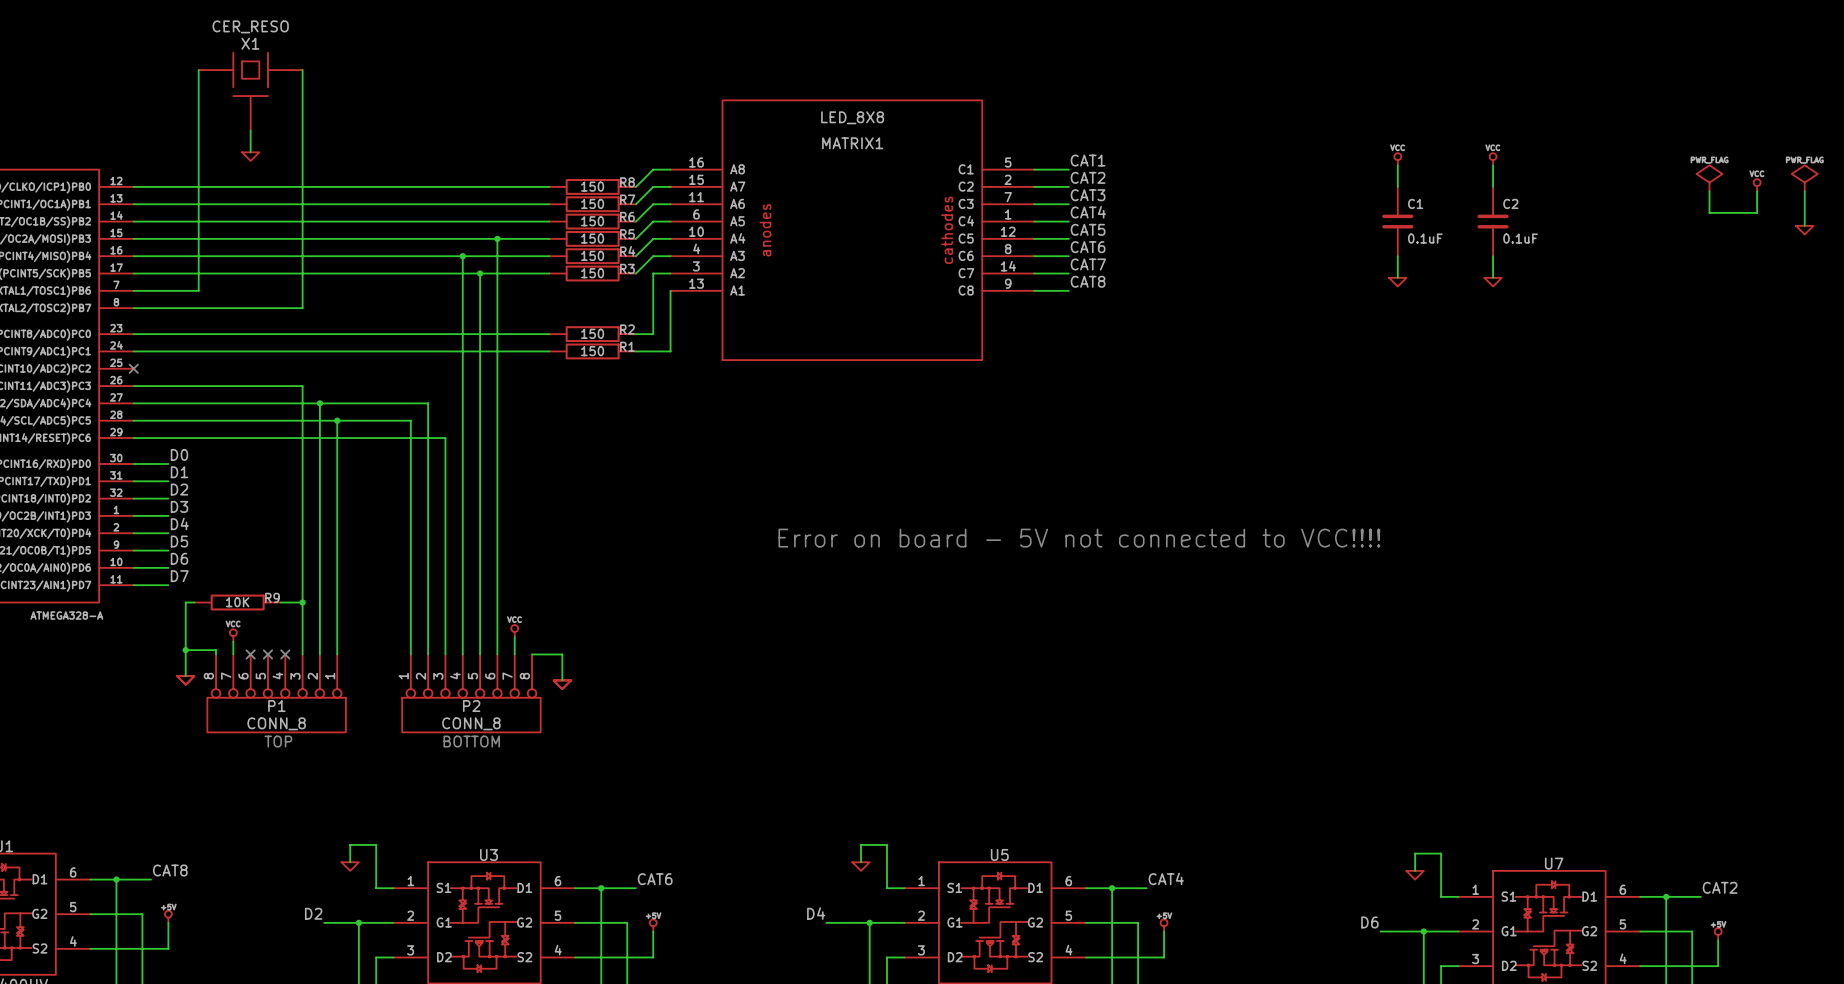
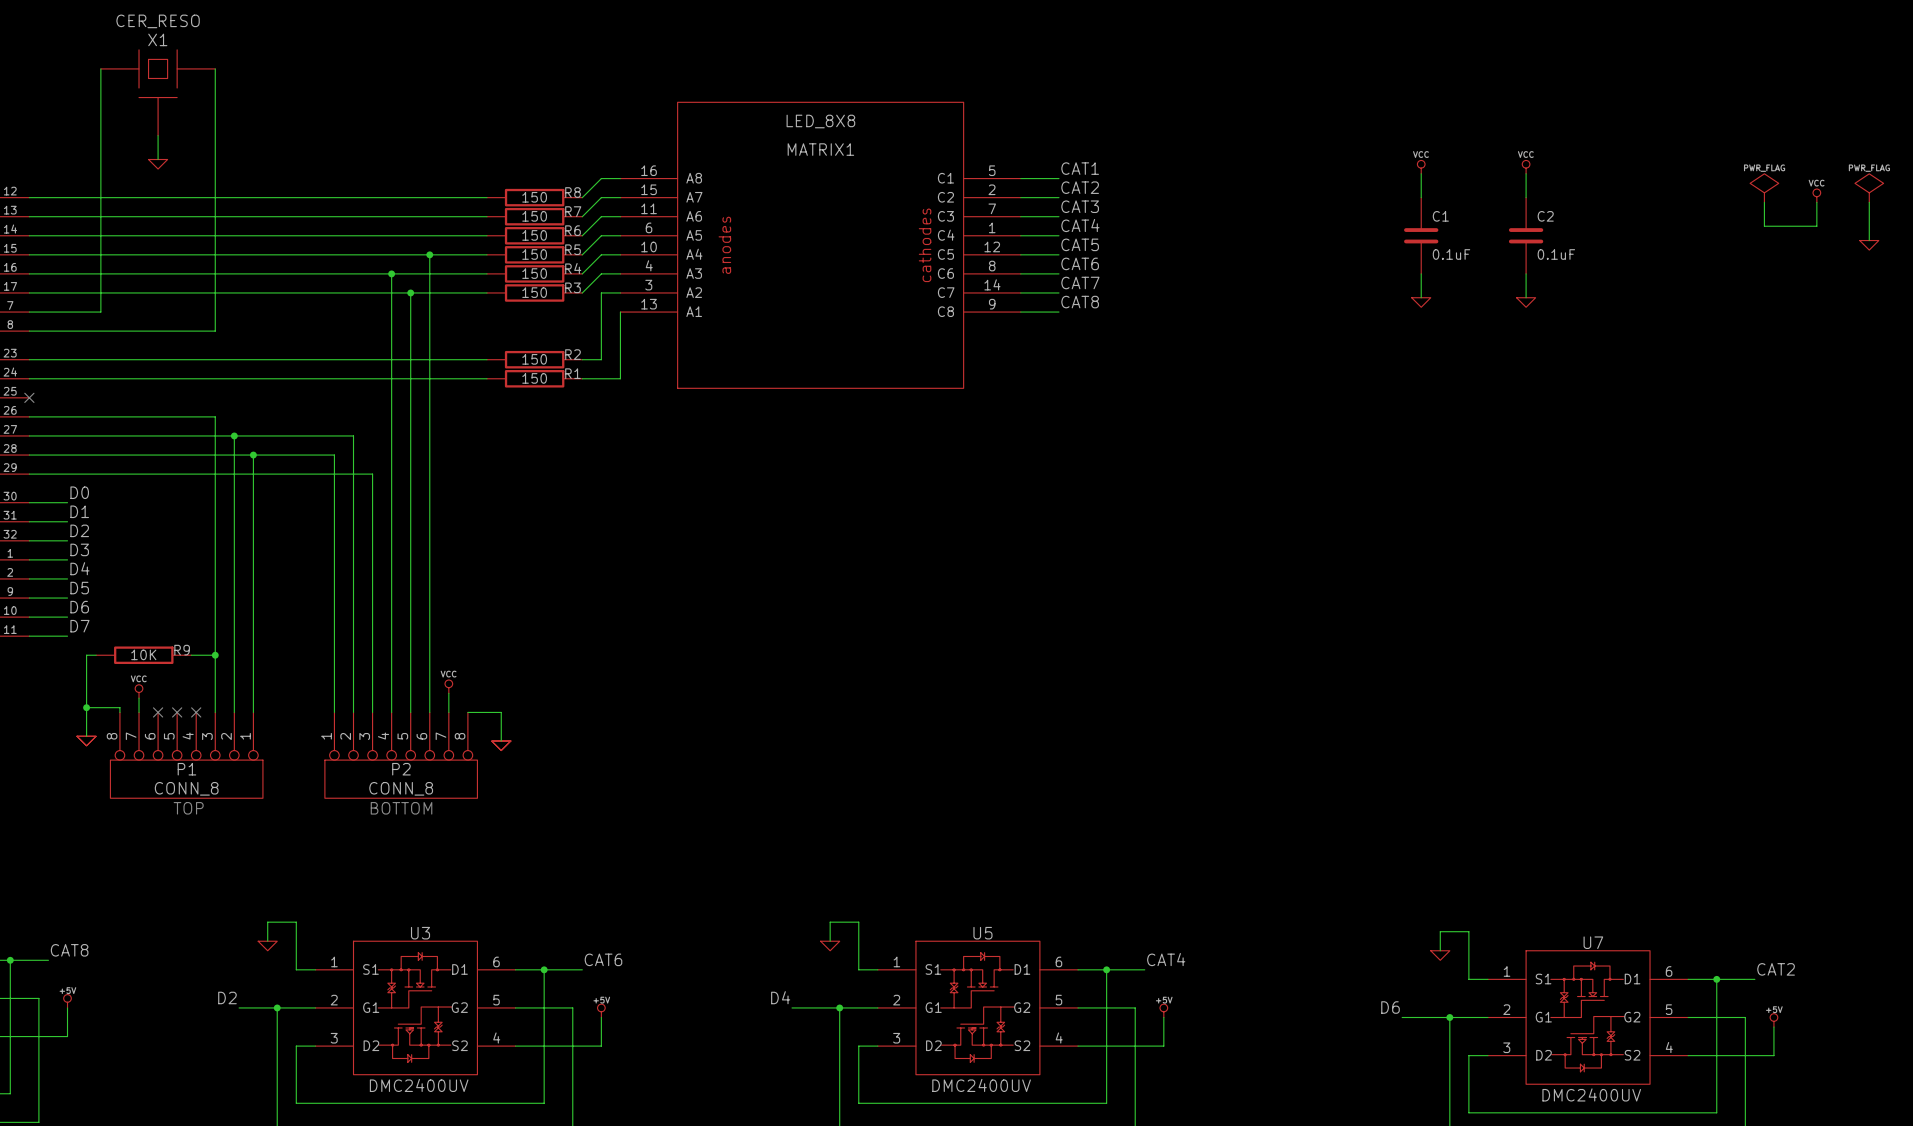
text: Error on board - 5V not connected to VCC!!!! (1079, 538) -> none

